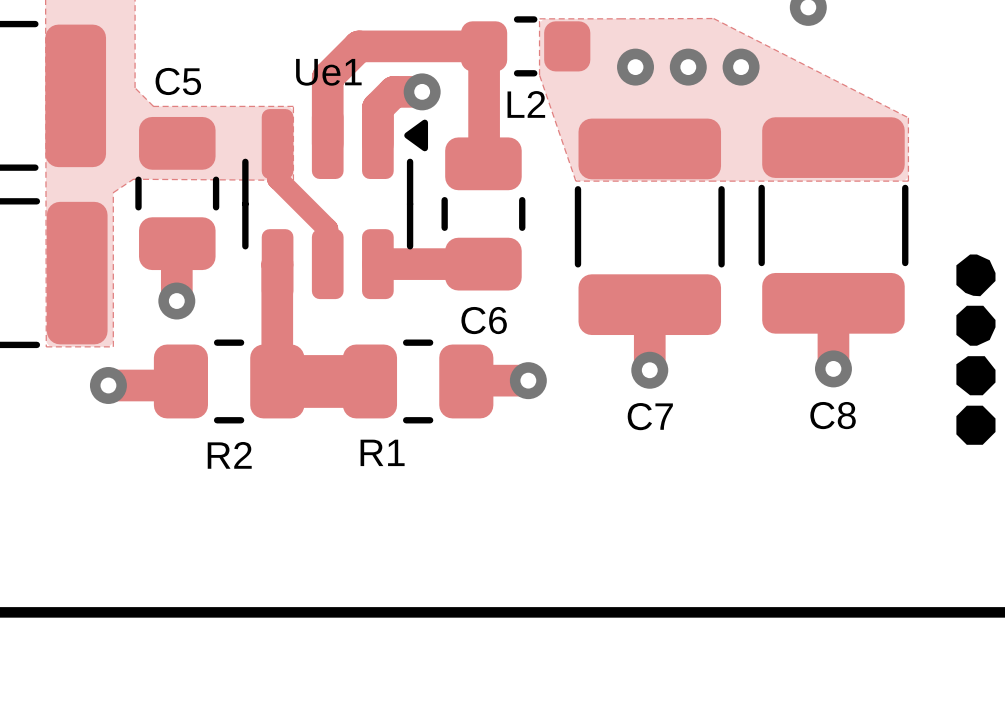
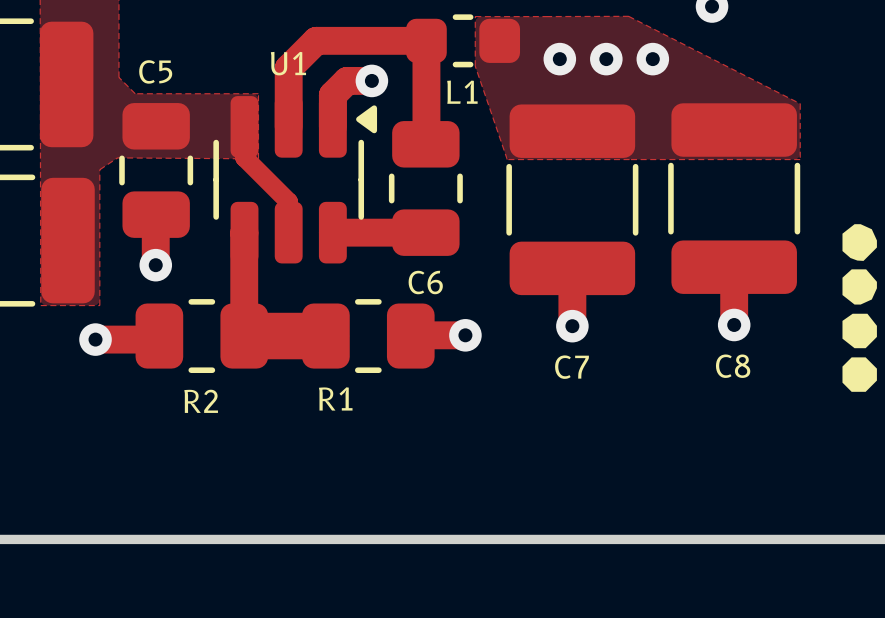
Ue1 name: Ue1 (328, 72) -> U1 (288, 63)
L2 name: L2 (526, 104) -> L1 (462, 92)

